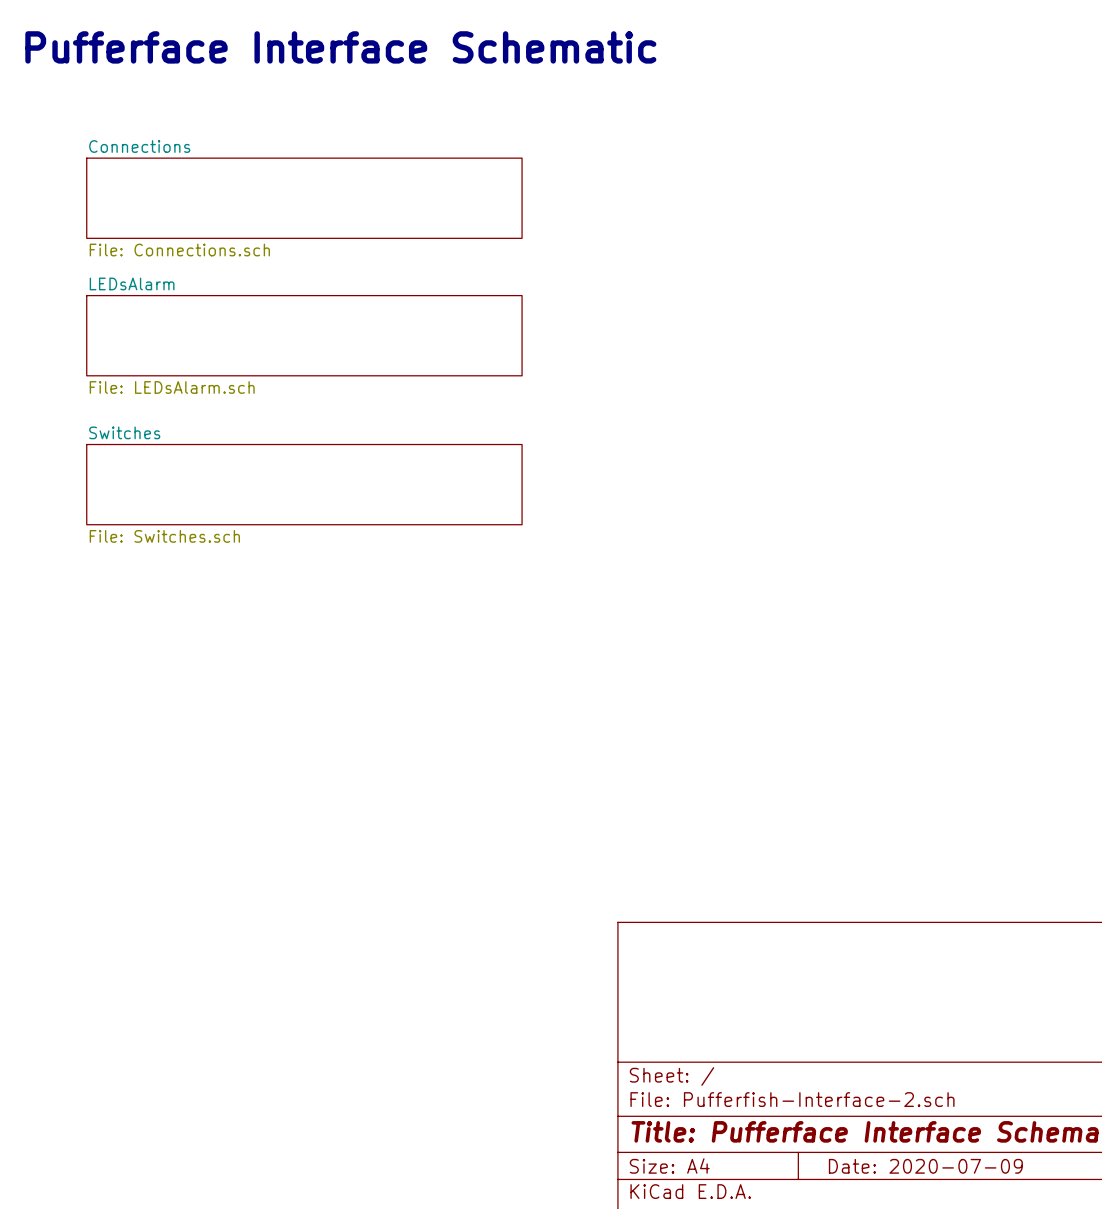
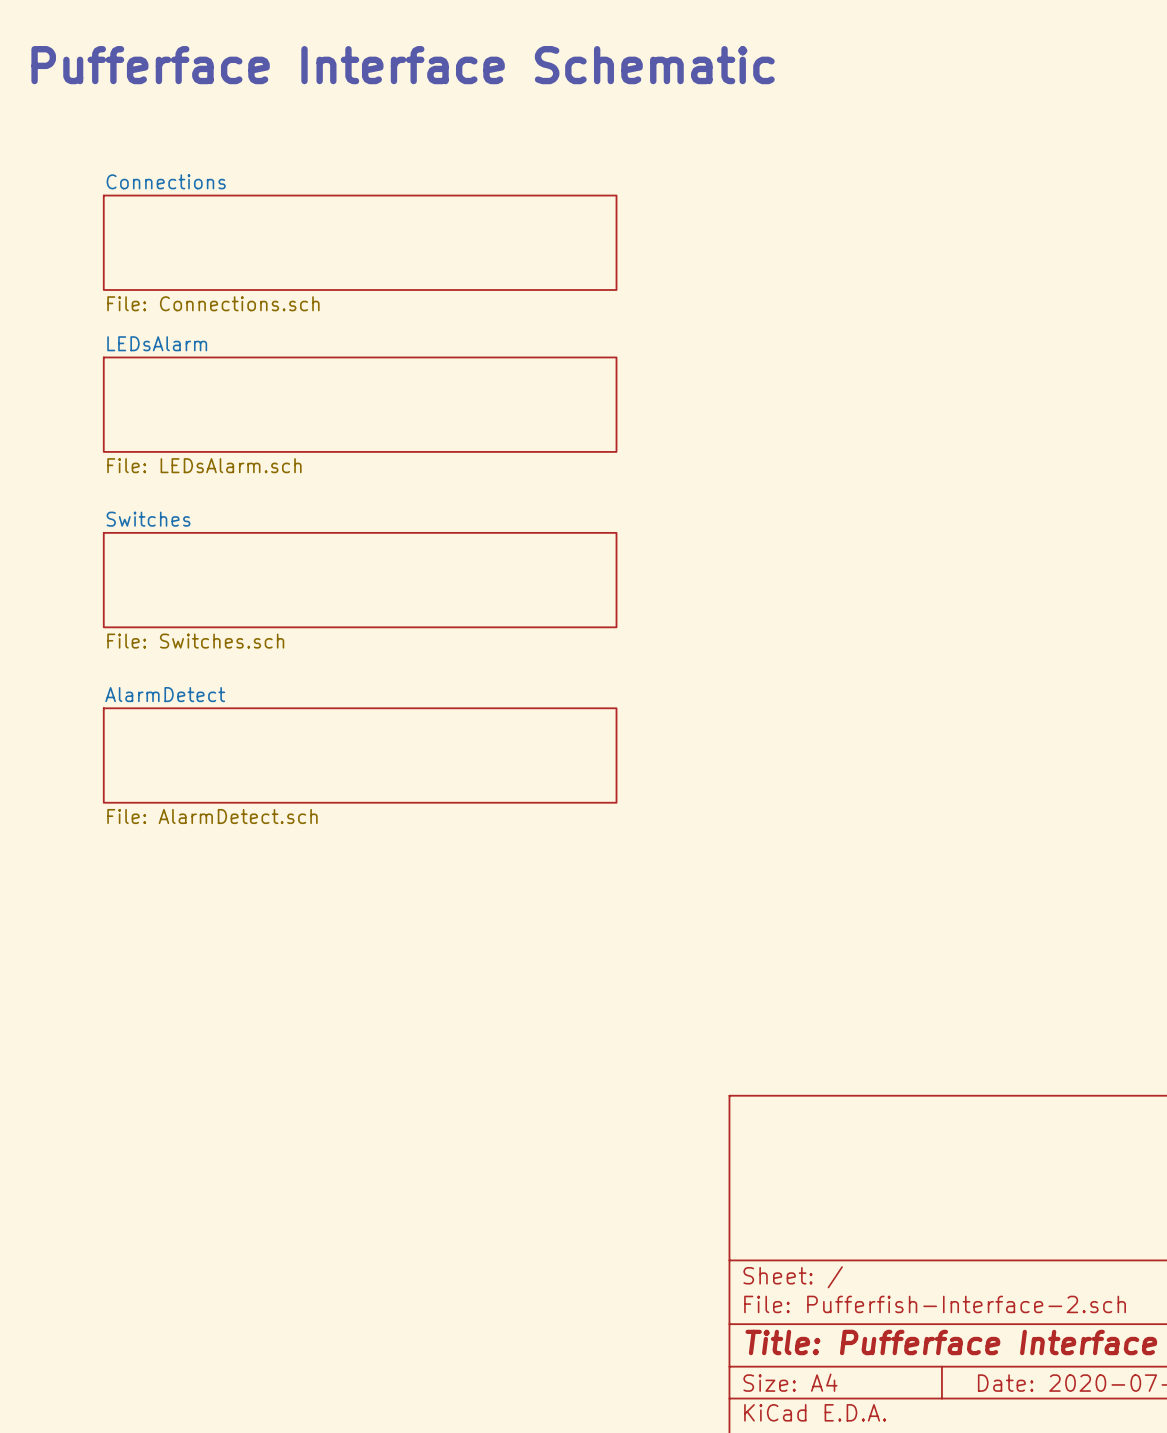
sheet AlarmDetect: none -> File: AlarmDetect.sch (360, 755)

